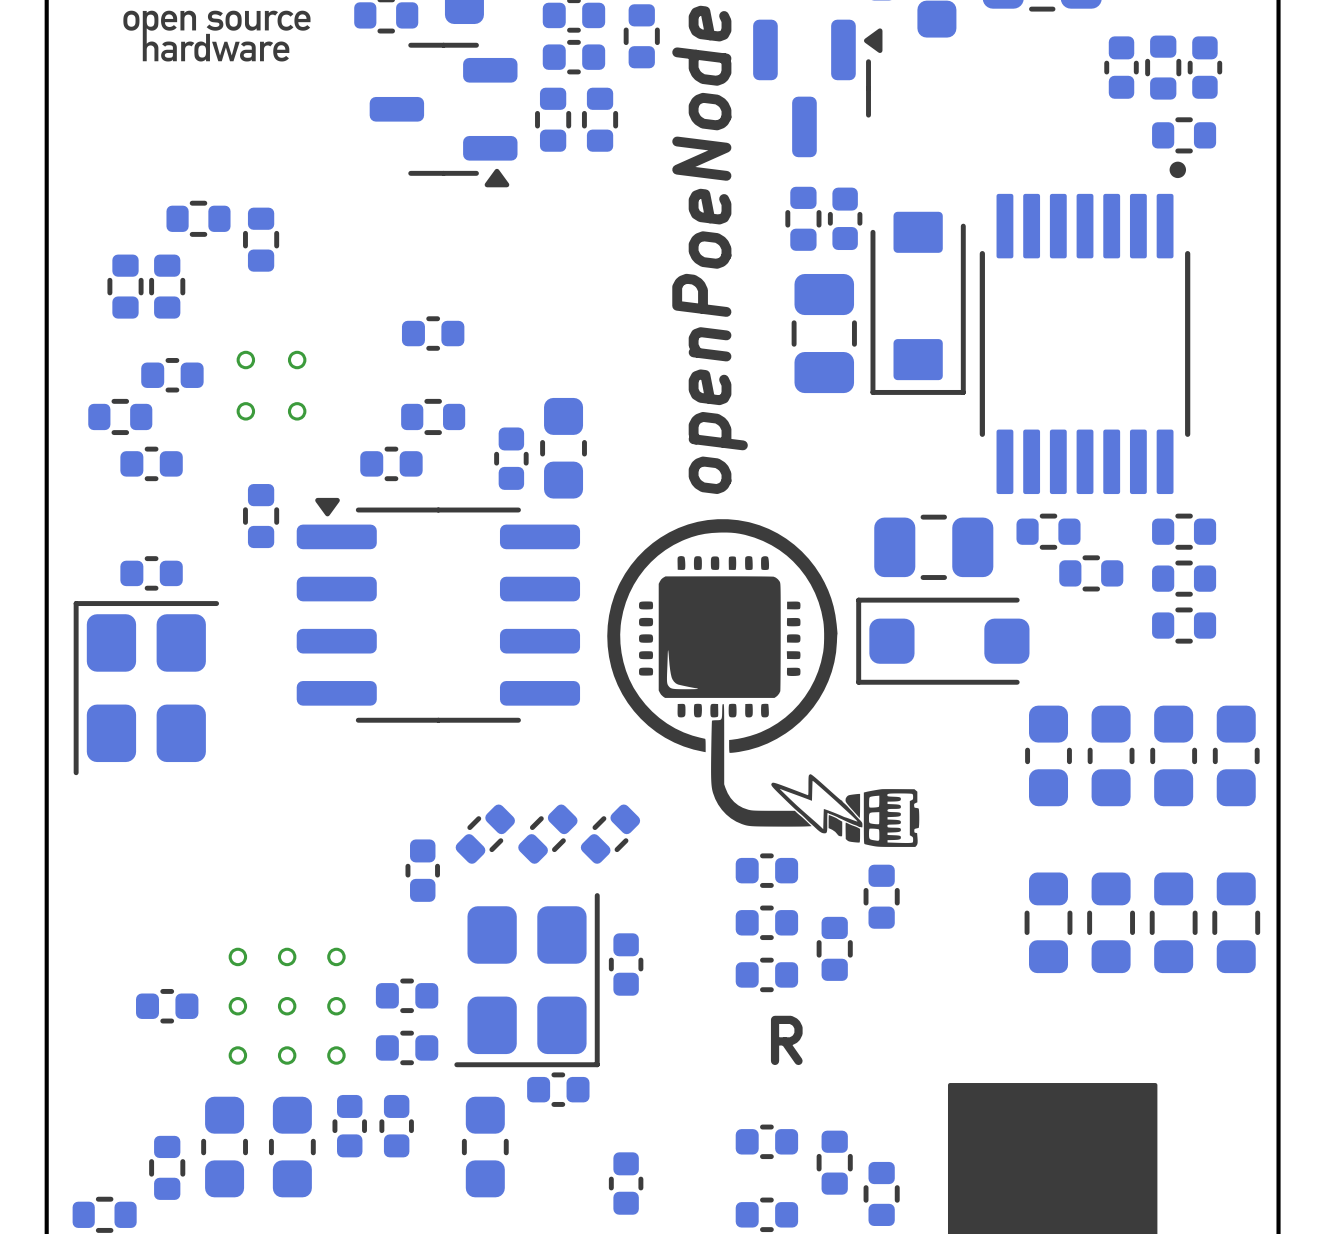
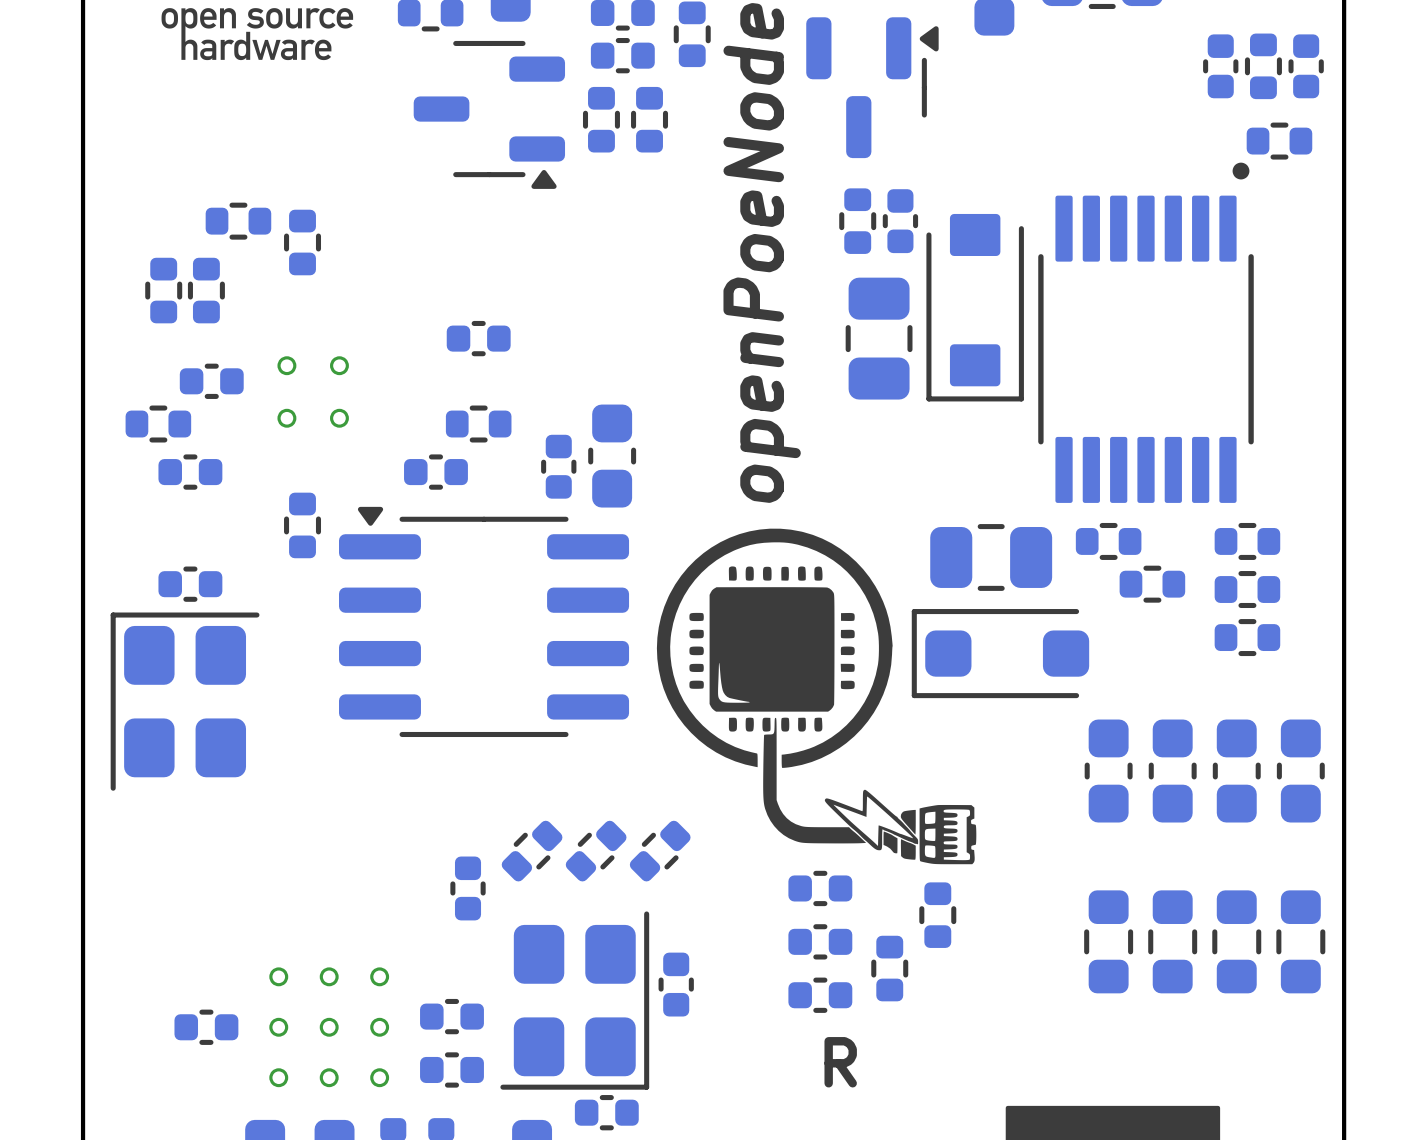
part footprint: [1145, 35, 1182, 100] -> [1203, 34, 1239, 99]
part footprint: [1187, 36, 1223, 99] -> [1244, 33, 1282, 100]
part position: (1121, 67) -> (1306, 66)
part position: (1184, 135) -> (1279, 141)

